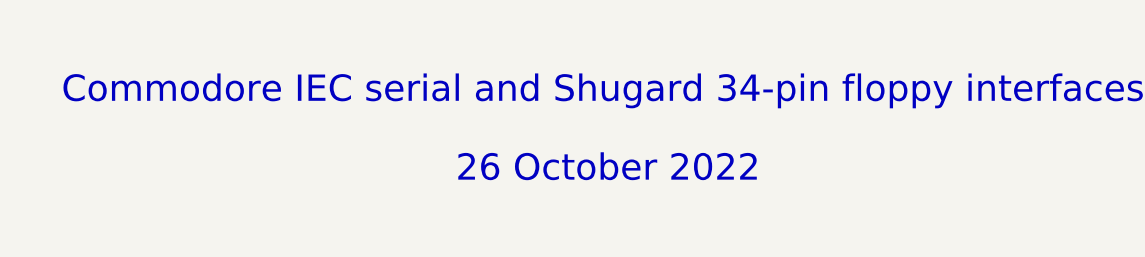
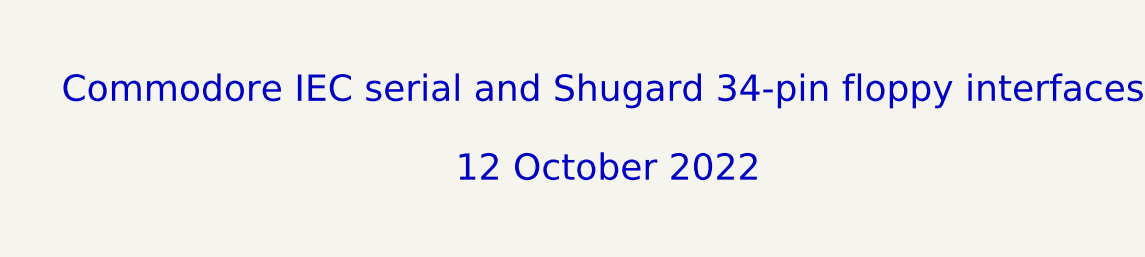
text: 26 October 2022 (607, 166) -> 12 October 2022 (608, 166)

